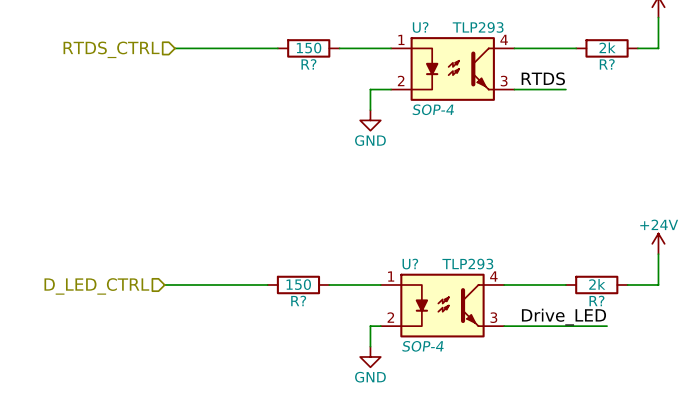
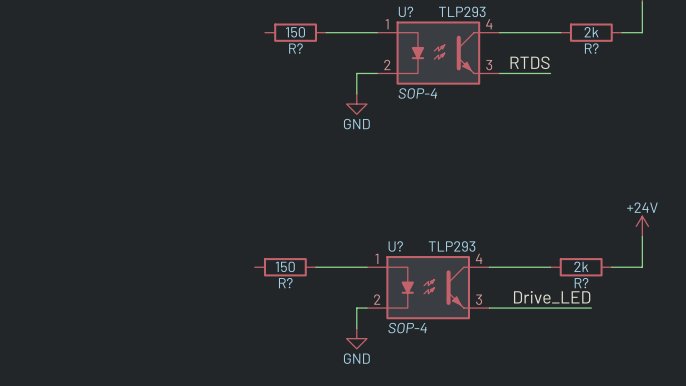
wire: (175, 48) (277, 48) -> none
hierarchical label: RTDS_CTRL (111, 49) -> none
wire: (164, 284) (267, 284) -> none
hierarchical label: D_LED_CTRL (96, 286) -> none

